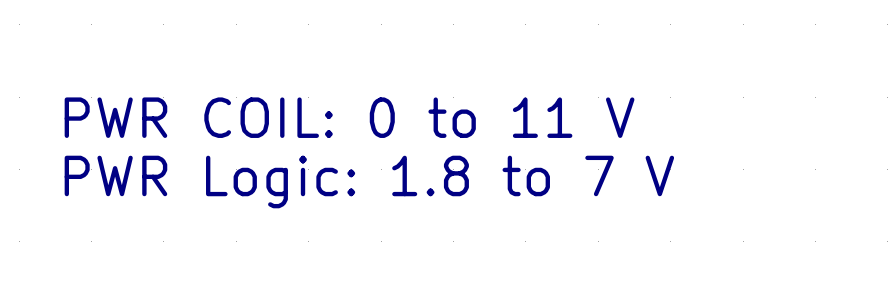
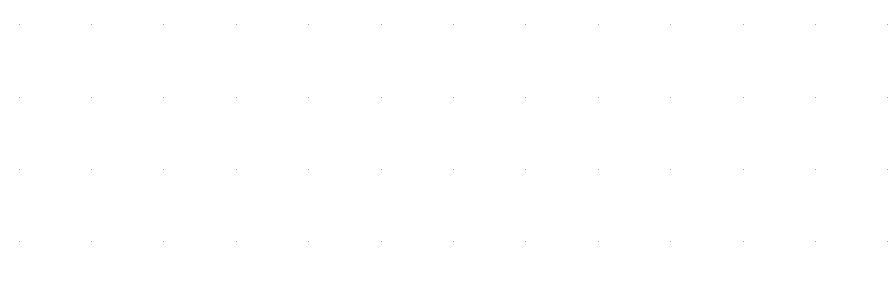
text: PWR COIL: 0 to 11 V (349, 117) -> none
text: PWR Logic: 1.8 to 7 V (369, 182) -> none

